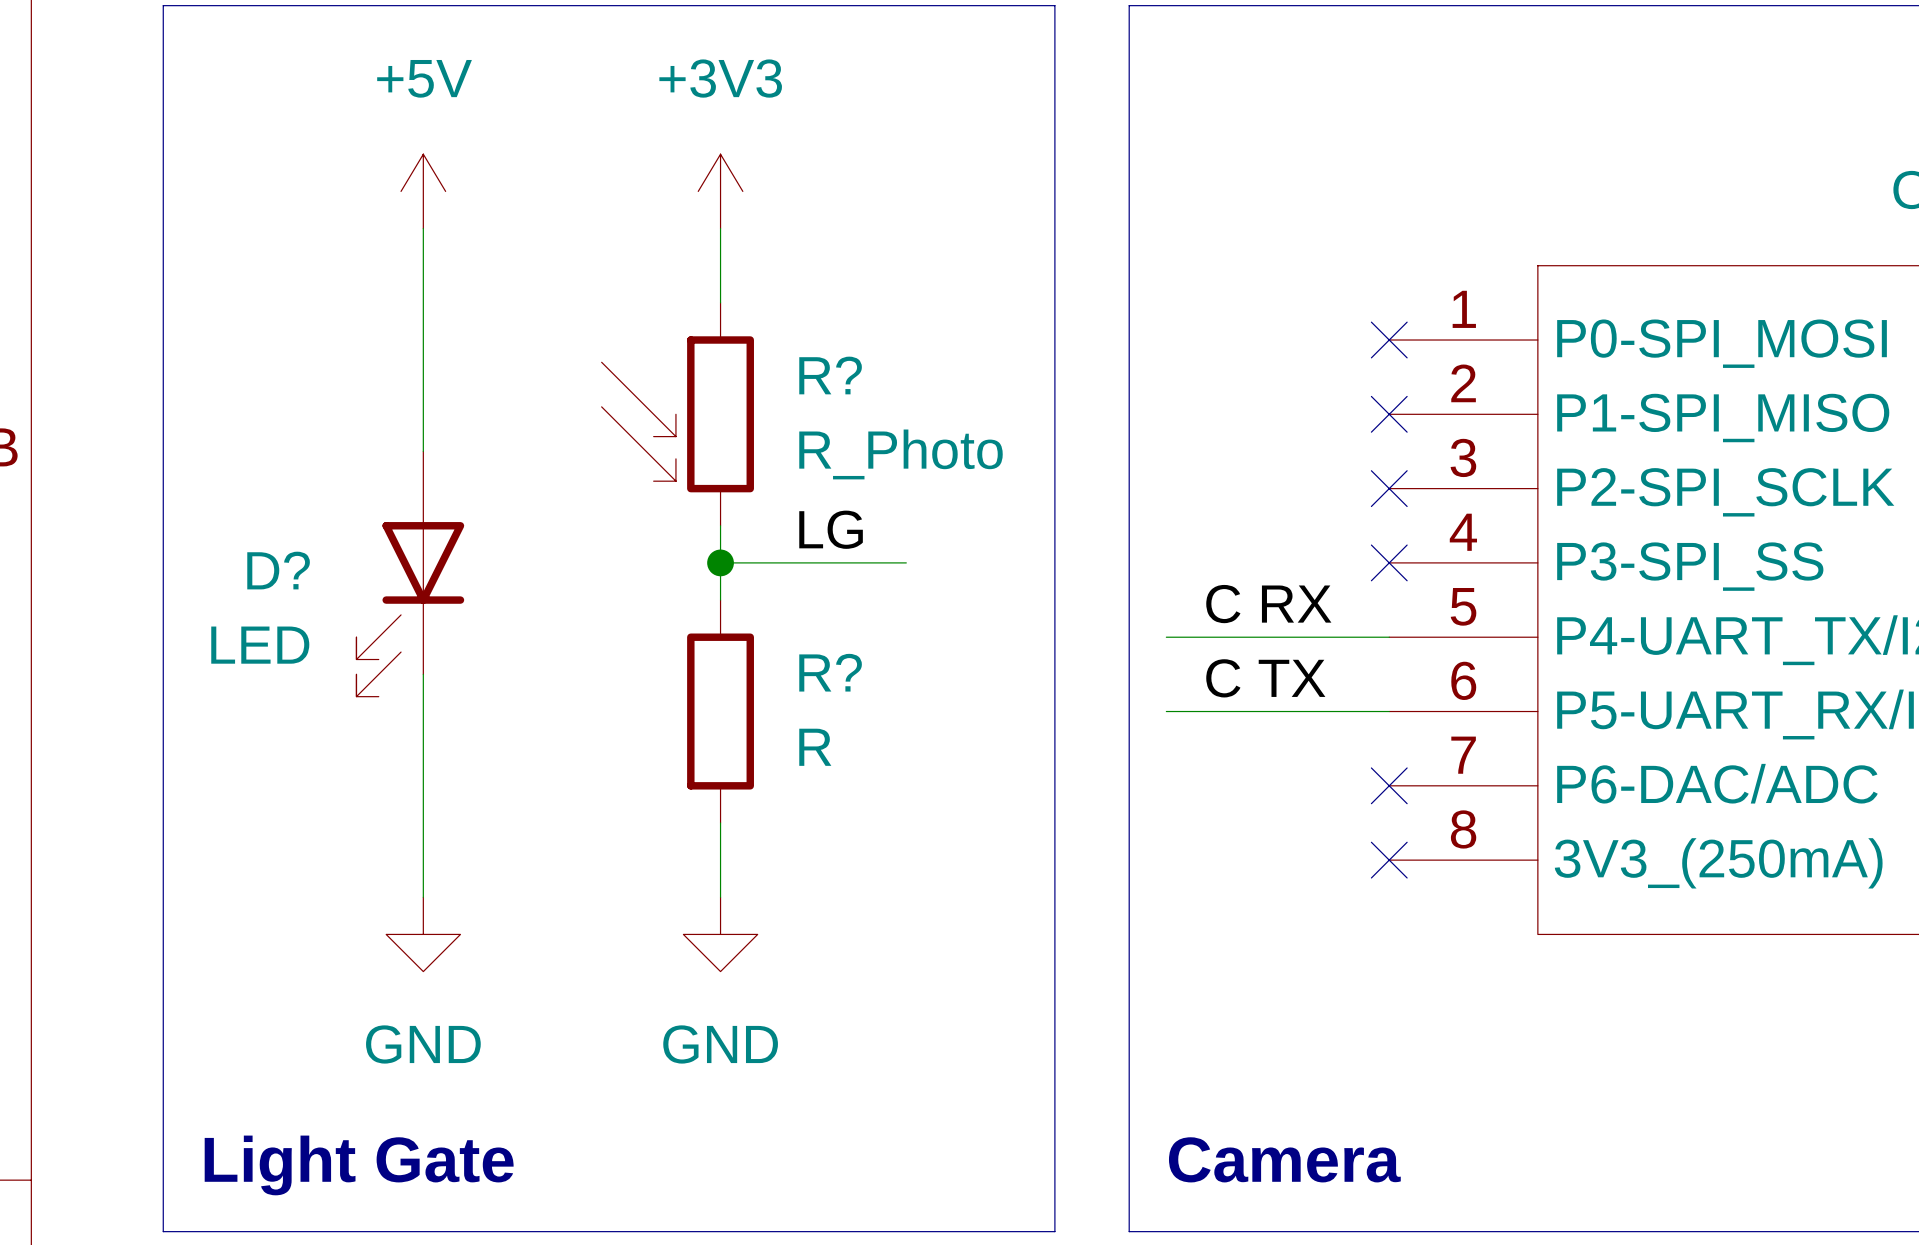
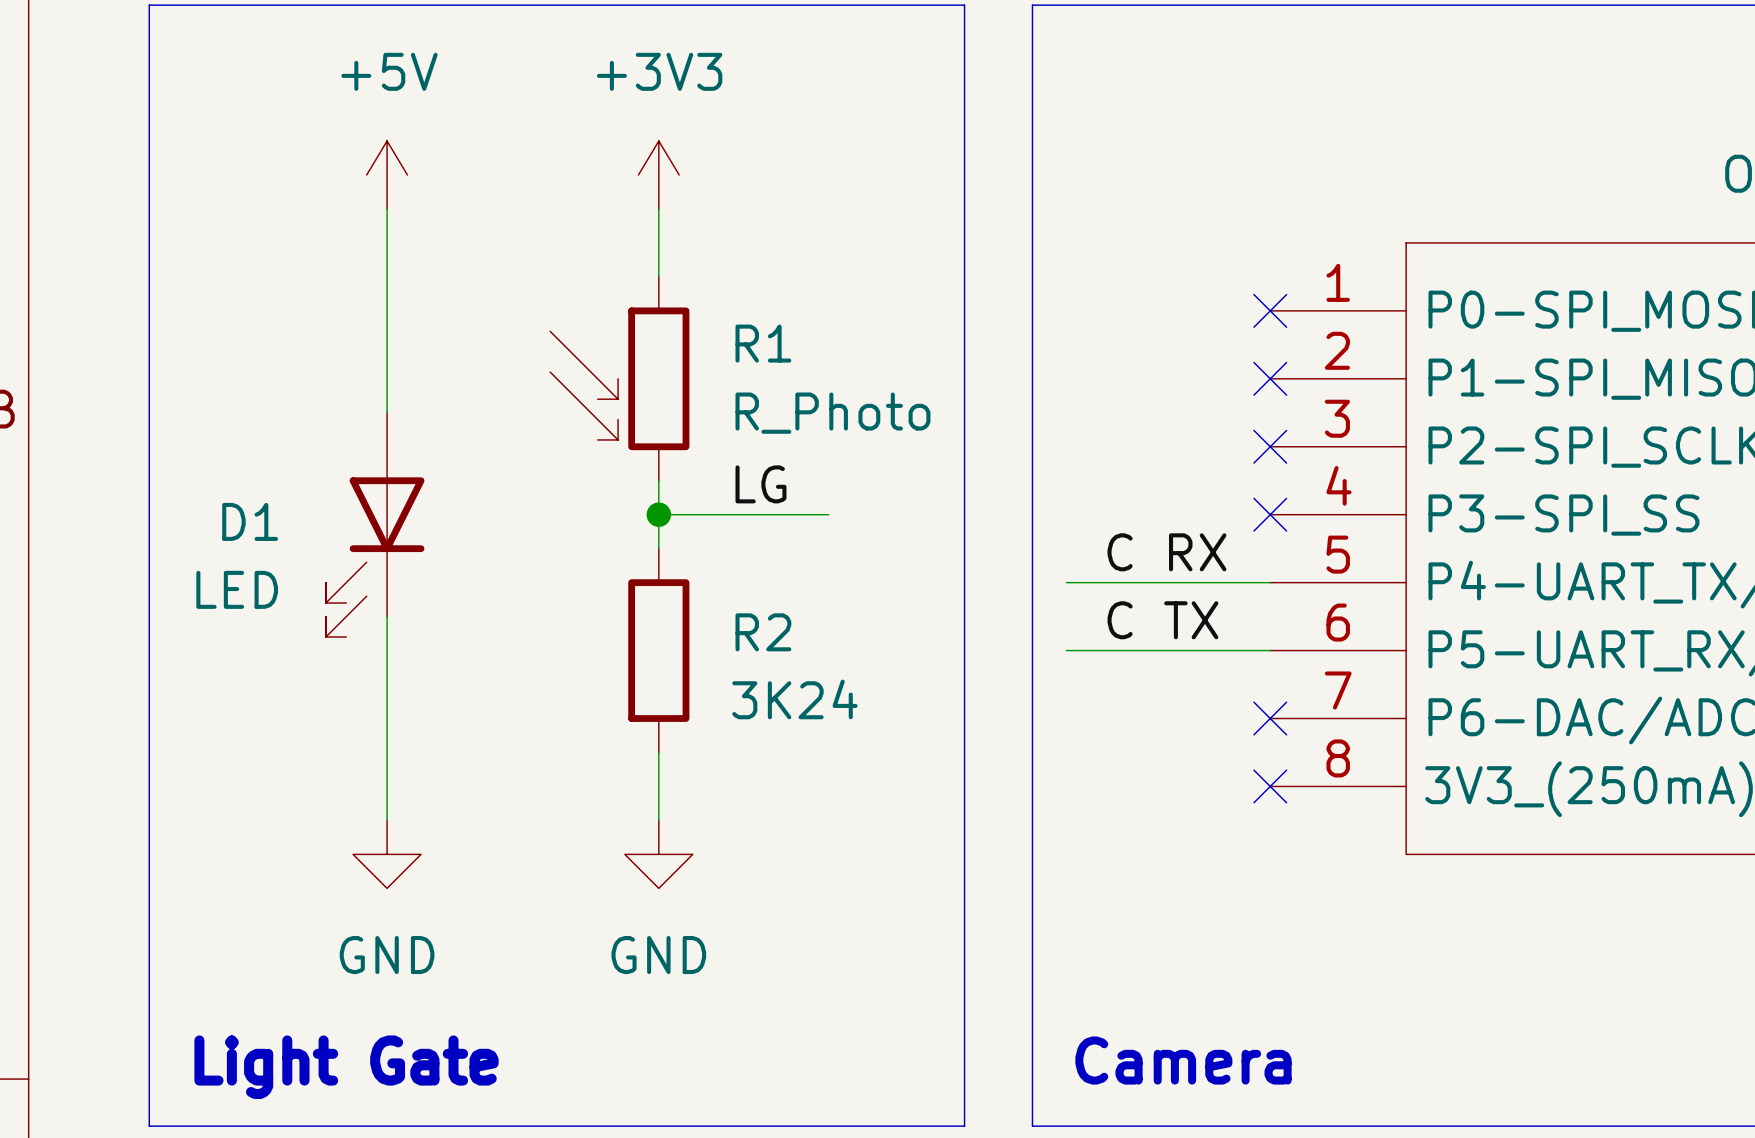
R? name: R? (830, 375) -> R1 (763, 343)
D? name: D? (278, 570) -> D1 (250, 521)
R? name: R? (830, 672) -> R2 (763, 632)
R? value: R (815, 747) -> 3K24 (794, 699)

